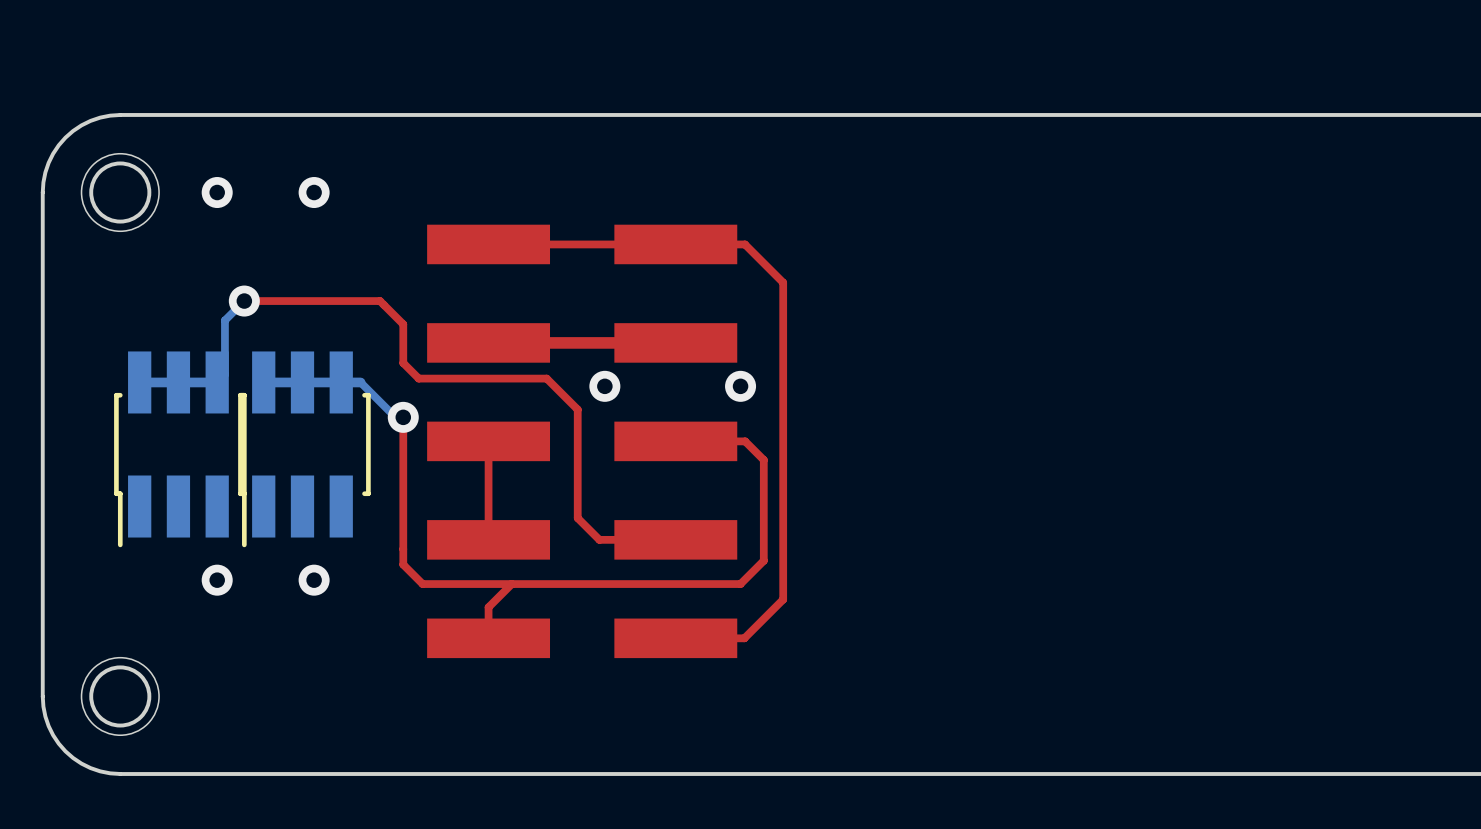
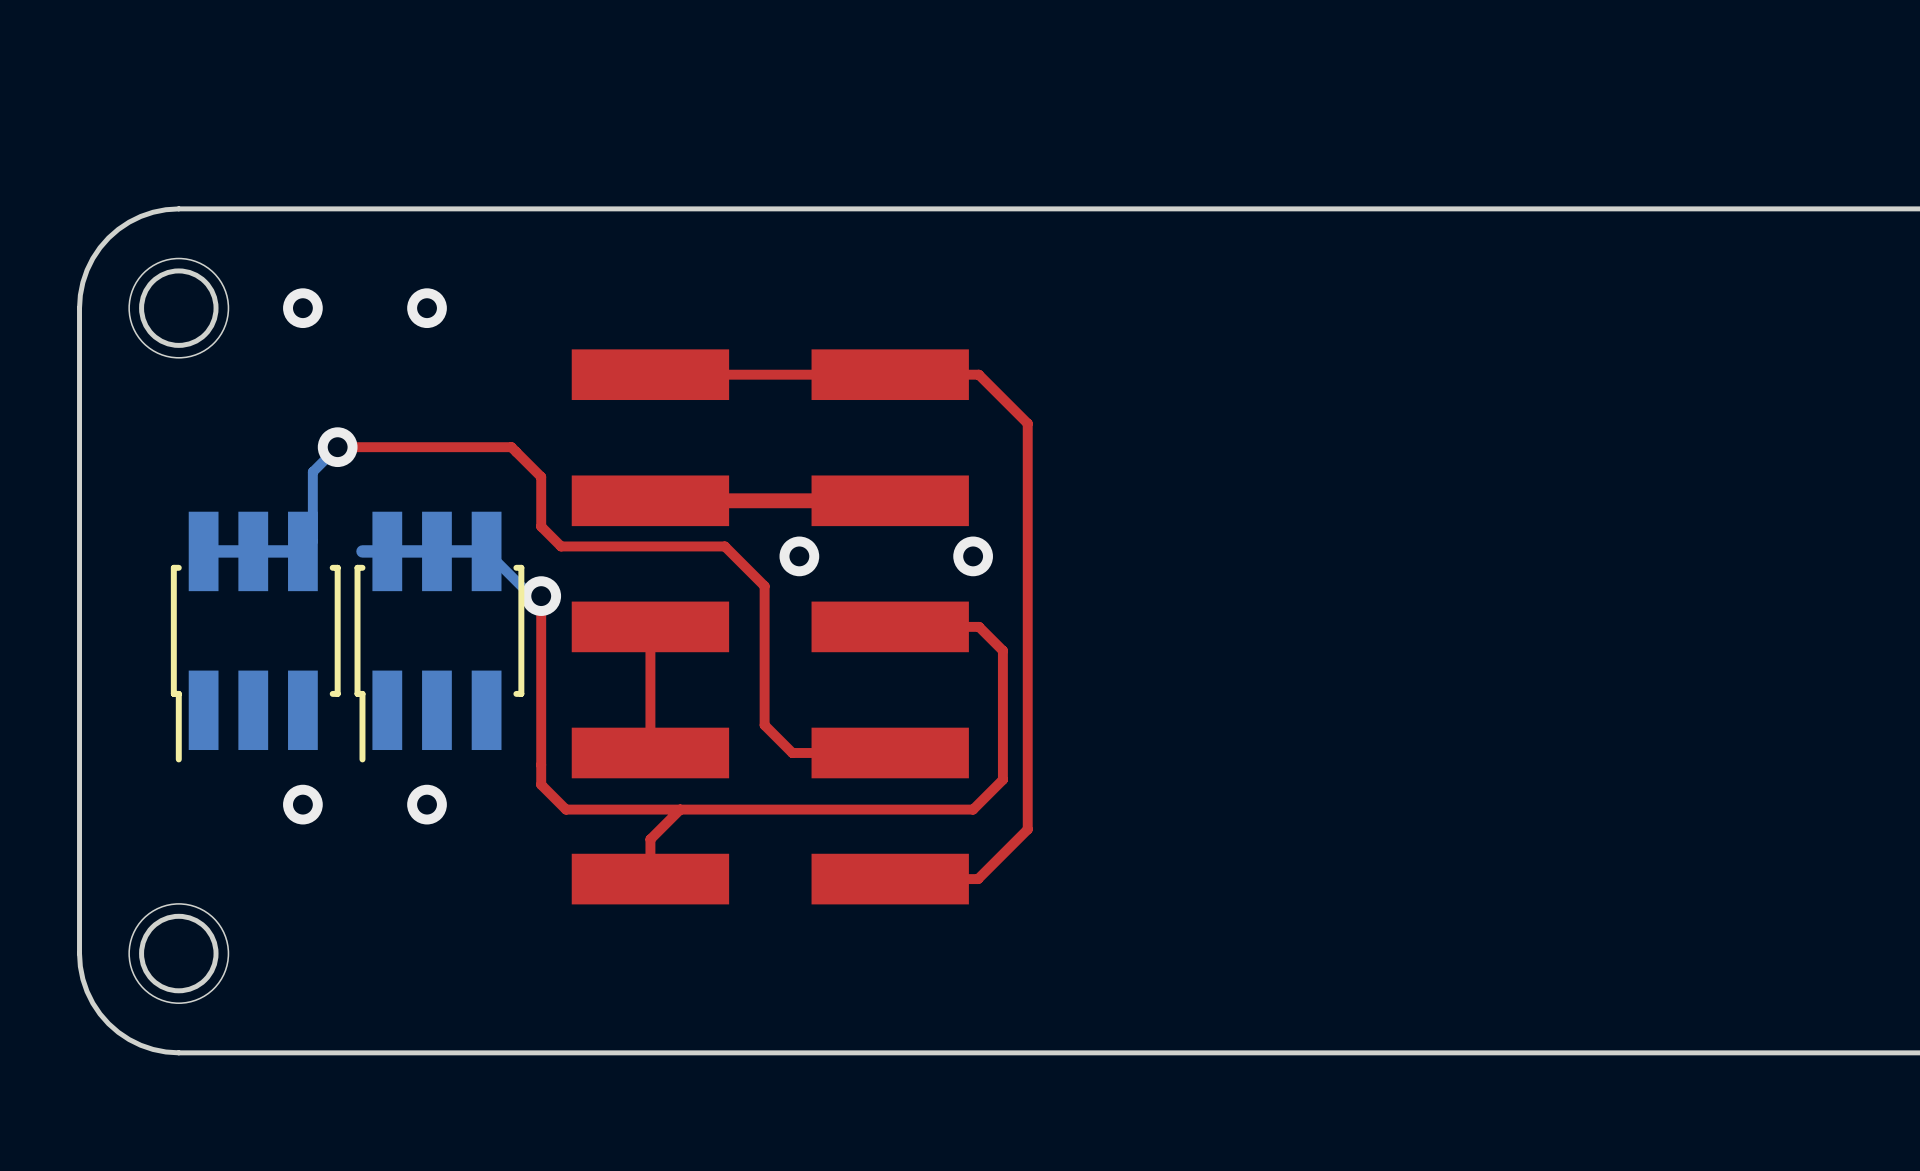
part position: (304, 449) -> (439, 637)

